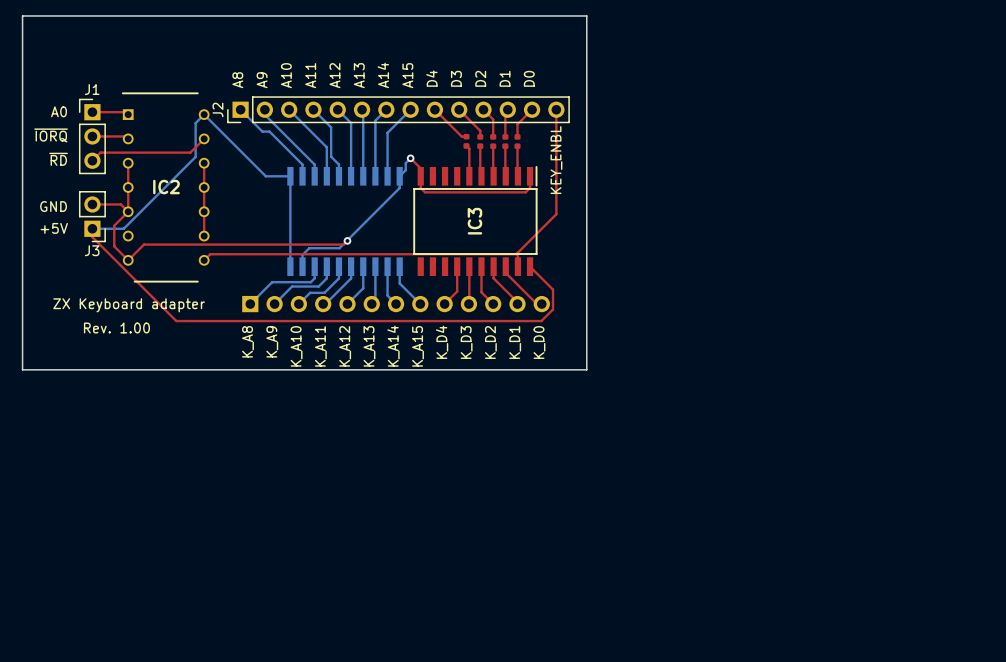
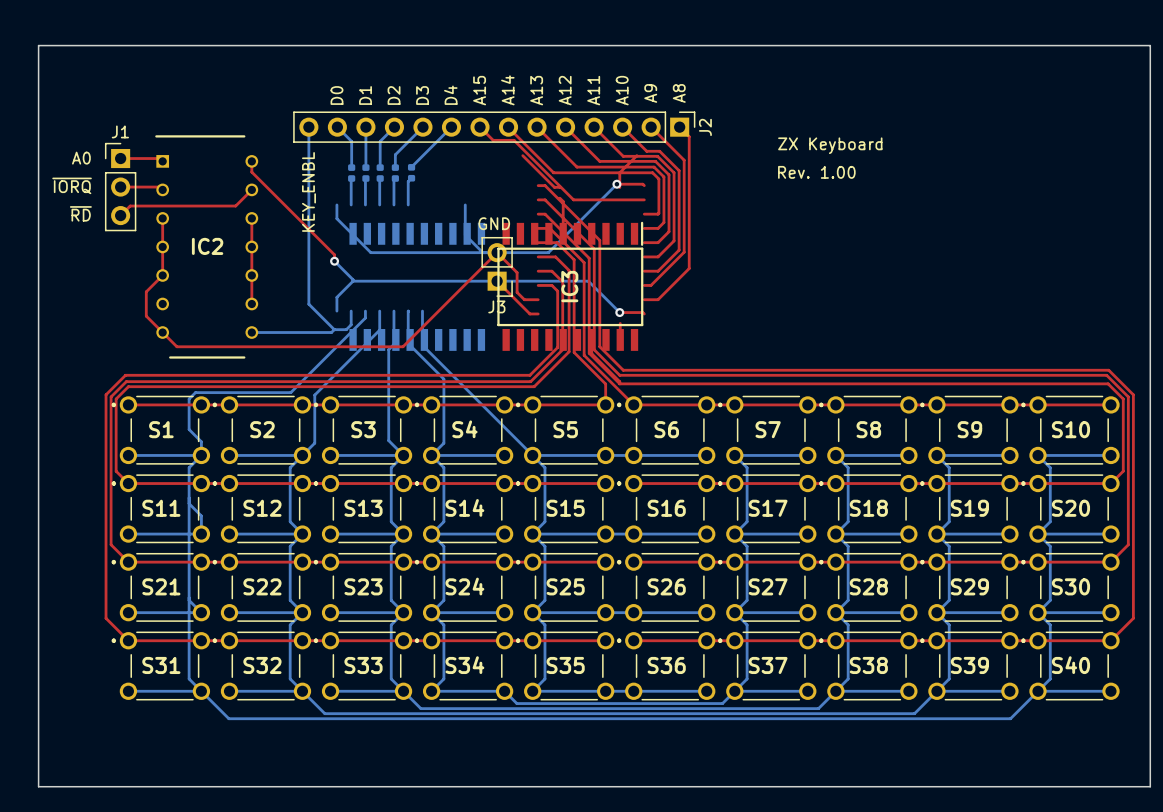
board edge: (586, 15) (586, 369) (22, 369) -> (701, 45) (1150, 45) (1150, 786) (38, 786) (38, 461)
text: none -> A9 (650, 93)
text: none -> A8 (679, 93)
text: none -> D0 (336, 95)
text position: A10 (286, 75) -> A10 (622, 90)
text position: A11 (310, 75) -> A11 (593, 90)
text position: A12 (334, 75) -> A12 (565, 90)
text position: A13 (359, 75) -> A13 (536, 90)
text position: A14 (383, 75) -> A14 (507, 90)
text position: A15 (407, 75) -> A15 (479, 90)
text position: D4 (431, 78) -> D4 (450, 95)
text position: D3 (456, 78) -> D3 (422, 95)
text position: D2 (480, 78) -> D2 (394, 95)
text position: D1 (505, 78) -> D1 (365, 95)
text: D0 (529, 78) -> none
text: A8 (237, 80) -> none
text: A9 (262, 80) -> none
bottom track: none -> (308, 127) (308, 304) (334, 329)
bottom track: none -> (337, 127) (351, 141) (351, 167)
bottom track: none -> (365, 127) (365, 167)
bottom track: none -> (394, 127) (380, 141) (380, 167)
bottom track: none -> (422, 127) (395, 154) (395, 167)
bottom track: none -> (451, 127) (411, 167)
top track: none -> (480, 127) (493, 140) (514, 140) (573, 199) (644, 199)
top track: none -> (508, 127) (553, 172) (652, 172) (658, 179) (658, 213) (644, 214)
top track: none -> (537, 127) (576, 167) (654, 167) (663, 176) (663, 222) (658, 228) (644, 228)
top track: none -> (565, 127) (599, 161) (655, 161) (669, 174) (669, 231) (658, 242) (644, 242)
top track: none -> (594, 127) (623, 156) (657, 156) (674, 172) (674, 240) (658, 256) (644, 256)
top track: none -> (622, 127) (646, 151) (659, 151) (679, 170) (679, 250) (658, 271) (644, 271)
top track: none -> (651, 127) (684, 160) (684, 252) (650, 285) (644, 285)
top track: none -> (679, 127) (689, 136) (689, 268) (658, 299) (644, 299)
text: none -> ZX Keyboard (830, 145)
bottom track: (240, 109) (262, 131) (269, 131) (302, 164) (302, 176) -> none
bottom track: (264, 109) (264, 114) (314, 164) (314, 176) -> none
bottom track: (289, 109) (326, 147) (326, 176) -> none
bottom track: (313, 109) (331, 127) (331, 156) (338, 164) (338, 176) -> none
bottom track: (337, 109) (351, 123) (351, 176) -> none
bottom track: (362, 109) (363, 176) -> none
bottom track: (386, 109) (375, 120) (375, 176) -> none
J2 rotation: 0° (398, 109) -> 180° (494, 127)
bottom track: (410, 109) (387, 132) (387, 176) -> none
top track: (459, 109) (480, 130) (480, 136) -> none
top track: (483, 109) (493, 119) (493, 136) -> none
top track: (507, 109) (505, 112) (505, 136) -> none
top track: (556, 109) (556, 214) (516, 254) (210, 254) (204, 260) -> none
top track: none -> (251, 161) (251, 172) (334, 254) (334, 261)
text: none -> Rev. 1.00 (816, 172)
bottom track: none -> (411, 178) (408, 181) (408, 204)
bottom track: none -> (351, 178) (351, 204)
bottom track: none -> (365, 178) (365, 204)
bottom track: none -> (380, 178) (379, 204)
bottom track: none -> (395, 178) (393, 204)
bottom track: none -> (616, 184) (548, 252) (370, 252) (336, 218) (336, 204)
top track: none -> (616, 184) (644, 185)
via: none -> (616, 184)
top track: none -> (538, 185) (545, 185) (599, 240) (599, 346) (623, 370) (1108, 370) (1133, 394) (1133, 618) (1110, 640) (633, 640)
text: none -> KEY_ENBL (308, 191)
part side: top (466, 141) -> bottom (411, 172)
part side: top (480, 141) -> bottom (395, 173)
part side: top (493, 141) -> bottom (380, 173)
part side: top (505, 141) -> bottom (365, 173)
part side: top (517, 141) -> bottom (351, 173)
top track: (480, 146) (481, 176) -> none
top track: (493, 146) (493, 176) -> none
top track: (505, 146) (505, 176) -> none
top track: (517, 146) (517, 176) -> none
top track: none -> (538, 199) (545, 199) (594, 249) (594, 349) (619, 375) (1106, 375) (1128, 396) (1128, 544) (1110, 562) (633, 562)
bottom track: none -> (465, 204) (465, 235) (482, 252)
bottom track: (410, 158) (405, 163) (405, 170) (399, 176) (399, 188) (339, 248) (309, 248) (302, 254) (302, 266) -> none
top track: (410, 158) (420, 168) (420, 188) (425, 192) (525, 192) (530, 188) (530, 176) -> none
via: (410, 158) -> none
text: KEY_ENBL (556, 160) -> none
text: none -> GND (494, 223)
top track: none -> (538, 228) (549, 228) (584, 262) (584, 355) (633, 404) (1110, 404)
top track: none -> (538, 242) (557, 242) (574, 259) (574, 352) (605, 384) (605, 404) (128, 404)
top track: none -> (538, 256) (555, 256) (569, 270) (569, 351) (534, 386) (128, 386) (116, 399) (116, 471) (128, 483) (605, 483)
bottom track: none -> (334, 261) (353, 281)
via: none -> (334, 261)
top track: (92, 204) (120, 204) (128, 211) -> none
text: GND (53, 206) -> none
top track: none -> (538, 271) (551, 271) (562, 281) (562, 349) (530, 381) (126, 381) (111, 396) (111, 544) (128, 562) (605, 562)
J3 position: (92, 216) -> (497, 266)
bottom track: none -> (353, 281) (336, 297) (336, 311)
bottom track: none -> (353, 281) (588, 281) (619, 312)
top track: none -> (497, 281) (529, 313) (538, 313)
top track: none -> (538, 285) (551, 285) (557, 291) (557, 347) (529, 375) (125, 375) (106, 394) (106, 618) (128, 640) (605, 640)
text: +5V (54, 228) -> none
bottom track: (92, 228) (123, 228) (195, 156) (195, 123) (204, 114) (265, 176) (290, 176) (290, 266) -> none
top track: (92, 228) (92, 237) (176, 321) (541, 321) (553, 309) (553, 289) (530, 266) -> none
top track: (347, 240) (343, 244) (144, 244) (128, 260) -> (538, 299) (524, 299) (517, 292) (517, 272) (497, 252) (403, 346) (176, 346) (162, 332)
via: (347, 240) -> none
bottom track: none -> (351, 311) (351, 324) (346, 329) (334, 329)
bottom track: none -> (365, 311) (365, 317) (290, 392) (195, 392) (189, 399) (189, 429) (201, 441) (201, 455)
bottom track: none -> (379, 311) (379, 330) (314, 395) (314, 443) (290, 467) (290, 521) (302, 534)
bottom track: none -> (393, 311) (393, 344) (388, 349) (388, 440) (403, 455)
bottom track: none -> (408, 311) (408, 343) (443, 379) (443, 443) (431, 455)
bottom track: none -> (422, 311) (422, 345) (544, 467) (544, 521) (532, 534)
top track: none -> (619, 312) (644, 313)
via: none -> (619, 312)
bottom track: none -> (334, 329) (331, 332) (251, 332)
bottom track: (314, 266) (314, 278) (310, 282) (272, 282) (250, 304) -> none
bottom track: (326, 266) (326, 278) (318, 286) (292, 286) (274, 304) -> none
bottom track: (338, 266) (338, 278) (324, 292) (310, 292) (298, 304) -> none
bottom track: (351, 266) (351, 278) (325, 304) (323, 304) -> none
bottom track: (363, 266) (363, 288) (347, 304) -> none
bottom track: (375, 266) (375, 300) (371, 304) -> none
bottom track: (387, 266) (387, 295) (396, 304) -> none
bottom track: (399, 266) (399, 283) (420, 304) -> none
top track: (457, 266) (457, 291) (444, 304) -> none
top track: (469, 266) (468, 304) -> none
top track: (481, 266) (481, 292) (493, 304) -> none
top track: (505, 266) (505, 272) (536, 304) -> (538, 214) (545, 214) (589, 258) (589, 353) (619, 383) (642, 383)
part: (396, 304) -> none
top track: none -> (648, 383) (1108, 383) (1123, 399) (1123, 471) (1110, 483) (633, 483)
text: ZX Keyboard adapter (129, 305) -> none
text: Rev. 1.00 (116, 328) -> none
text: K_A8 (247, 341) -> none
text: K_A9 (272, 341) -> none
text: K_D4 (442, 342) -> none
text: K_D3 (466, 342) -> none
text: K_D2 (490, 342) -> none
text: K_D1 (515, 342) -> none
text: K_D0 (539, 342) -> none
S1: none -> (160, 430)
S2: none -> (261, 430)
S3: none -> (362, 430)
S4: none -> (464, 430)
S5: none -> (565, 430)
S6: none -> (666, 430)
S7: none -> (767, 430)
S8: none -> (868, 430)
S9: none -> (969, 430)
S10: none -> (1070, 430)
text: K_A10 (296, 346) -> none
text: K_A11 (320, 346) -> none
text: K_A12 (345, 346) -> none
text: K_A13 (369, 346) -> none
text: K_A14 (393, 346) -> none
text: K_A15 (418, 346) -> none
bottom track: none -> (128, 455) (201, 455)
bottom track: none -> (201, 455) (189, 467) (189, 678) (228, 718) (1010, 718) (1050, 678) (1050, 624) (1037, 612)
bottom track: none -> (229, 455) (302, 455)
bottom track: none -> (330, 455) (403, 455)
bottom track: none -> (403, 455) (391, 467) (391, 521) (403, 534)
bottom track: none -> (431, 455) (504, 455)
bottom track: none -> (431, 455) (443, 467) (443, 521) (431, 534)
bottom track: none -> (532, 455) (706, 455)
bottom track: none -> (807, 455) (734, 455) (747, 467) (747, 521) (734, 534)
bottom track: none -> (908, 455) (835, 455) (848, 467) (848, 521) (835, 534)
bottom track: none -> (1009, 455) (936, 455) (949, 467) (949, 521) (936, 534)
bottom track: none -> (1110, 455) (1037, 455) (1050, 467) (1050, 521) (1037, 534)
bottom track: none -> (189, 503) (201, 515) (201, 534) (128, 534)
S11: none -> (160, 508)
S12: none -> (261, 508)
S13: none -> (362, 508)
S14: none -> (464, 508)
S15: none -> (565, 508)
S16: none -> (666, 508)
S17: none -> (767, 508)
S18: none -> (868, 508)
S19: none -> (969, 508)
S20: none -> (1070, 508)
bottom track: none -> (229, 534) (302, 534)
bottom track: none -> (302, 534) (290, 546) (290, 600) (302, 612)
bottom track: none -> (330, 534) (403, 534)
bottom track: none -> (403, 534) (391, 546) (391, 600) (403, 612)
bottom track: none -> (431, 534) (504, 534)
bottom track: none -> (431, 534) (443, 546) (443, 600) (431, 612)
bottom track: none -> (532, 534) (706, 534)
bottom track: none -> (532, 534) (544, 546) (544, 600) (532, 612)
bottom track: none -> (734, 534) (807, 534)
bottom track: none -> (734, 534) (747, 546) (747, 600) (734, 612)
bottom track: none -> (835, 534) (908, 534)
bottom track: none -> (835, 534) (848, 546) (848, 600) (835, 612)
bottom track: none -> (936, 534) (1009, 534)
bottom track: none -> (936, 534) (949, 546) (949, 600) (936, 612)
bottom track: none -> (1037, 534) (1110, 534)
bottom track: none -> (1037, 534) (1050, 546) (1050, 600) (1037, 612)
S21: none -> (160, 587)
S22: none -> (261, 587)
S23: none -> (362, 587)
S24: none -> (464, 587)
S25: none -> (565, 587)
S26: none -> (666, 587)
S27: none -> (767, 587)
S28: none -> (868, 587)
S29: none -> (969, 587)
S30: none -> (1070, 587)
bottom track: none -> (189, 600) (201, 612) (128, 612)
bottom track: none -> (229, 612) (302, 612)
bottom track: none -> (302, 612) (290, 624) (290, 678) (324, 713) (914, 713) (949, 678) (949, 624) (936, 612)
bottom track: none -> (330, 612) (403, 612)
bottom track: none -> (403, 612) (391, 624) (391, 678) (420, 708) (818, 708) (848, 678) (848, 624) (835, 612)
bottom track: none -> (431, 612) (504, 612)
bottom track: none -> (431, 612) (443, 624) (443, 678) (431, 691) (504, 691) (516, 703) (722, 703) (747, 678) (747, 624) (734, 612)
bottom track: none -> (532, 612) (706, 612)
bottom track: none -> (532, 612) (544, 624) (544, 678) (532, 691) (706, 691)
bottom track: none -> (734, 612) (807, 612)
bottom track: none -> (835, 612) (908, 612)
bottom track: none -> (936, 612) (1009, 612)
bottom track: none -> (1037, 612) (1110, 612)
S31: none -> (160, 666)
S32: none -> (261, 666)
S33: none -> (362, 666)
S34: none -> (464, 666)
S35: none -> (565, 666)
S36: none -> (666, 666)
S37: none -> (767, 666)
S38: none -> (868, 666)
S39: none -> (969, 666)
S40: none -> (1070, 666)
bottom track: none -> (128, 691) (201, 691)
bottom track: none -> (229, 691) (302, 691)
bottom track: none -> (330, 691) (403, 691)
bottom track: none -> (734, 691) (807, 691)
bottom track: none -> (835, 691) (908, 691)
bottom track: none -> (936, 691) (1009, 691)
bottom track: none -> (1037, 691) (1110, 691)

